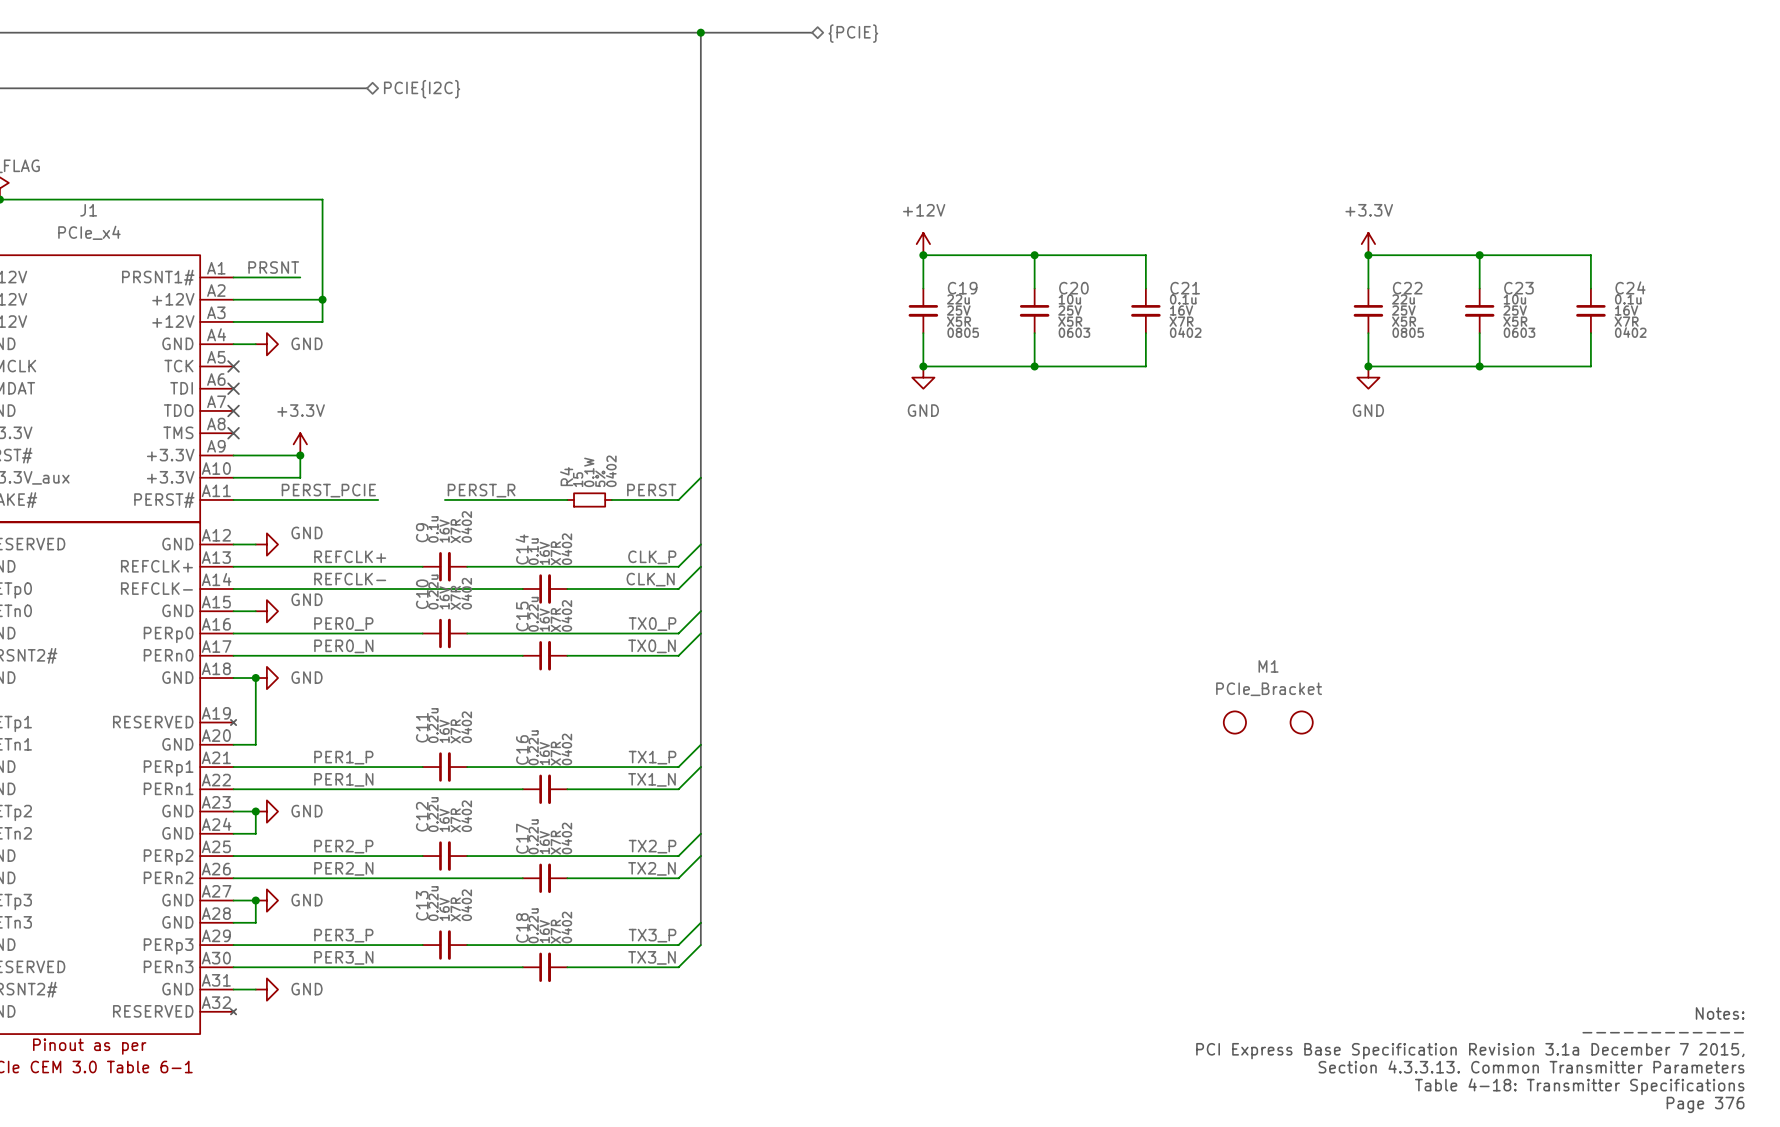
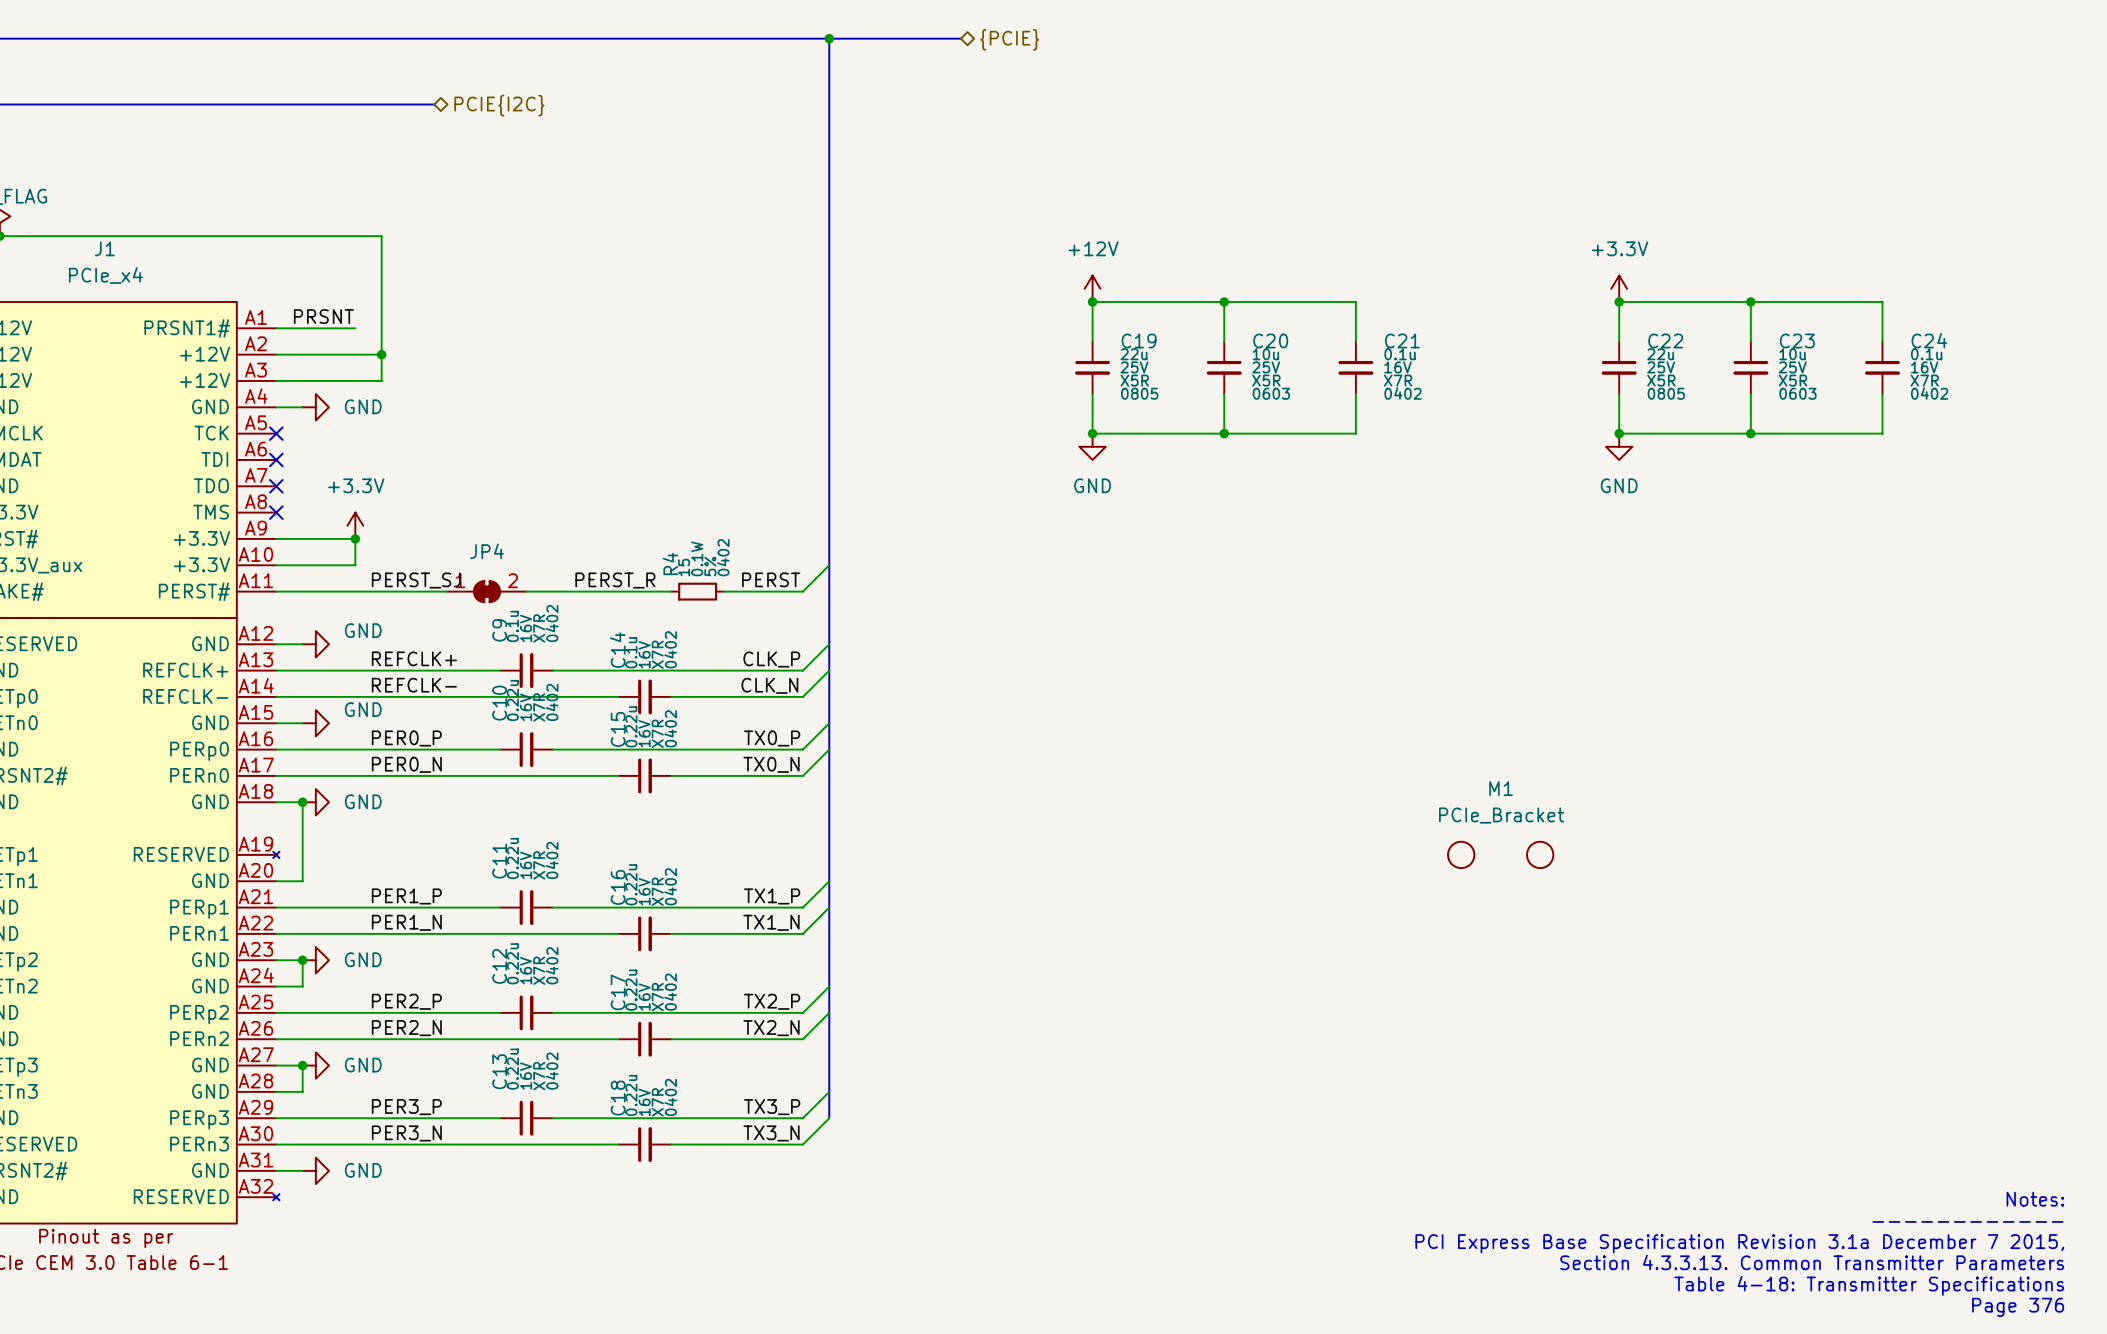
label: PERST_PCIE (328, 490) -> PERST_SJ (416, 580)
label position: PERST_R (481, 490) -> PERST_R (615, 580)
JP4: none -> (486, 591)

